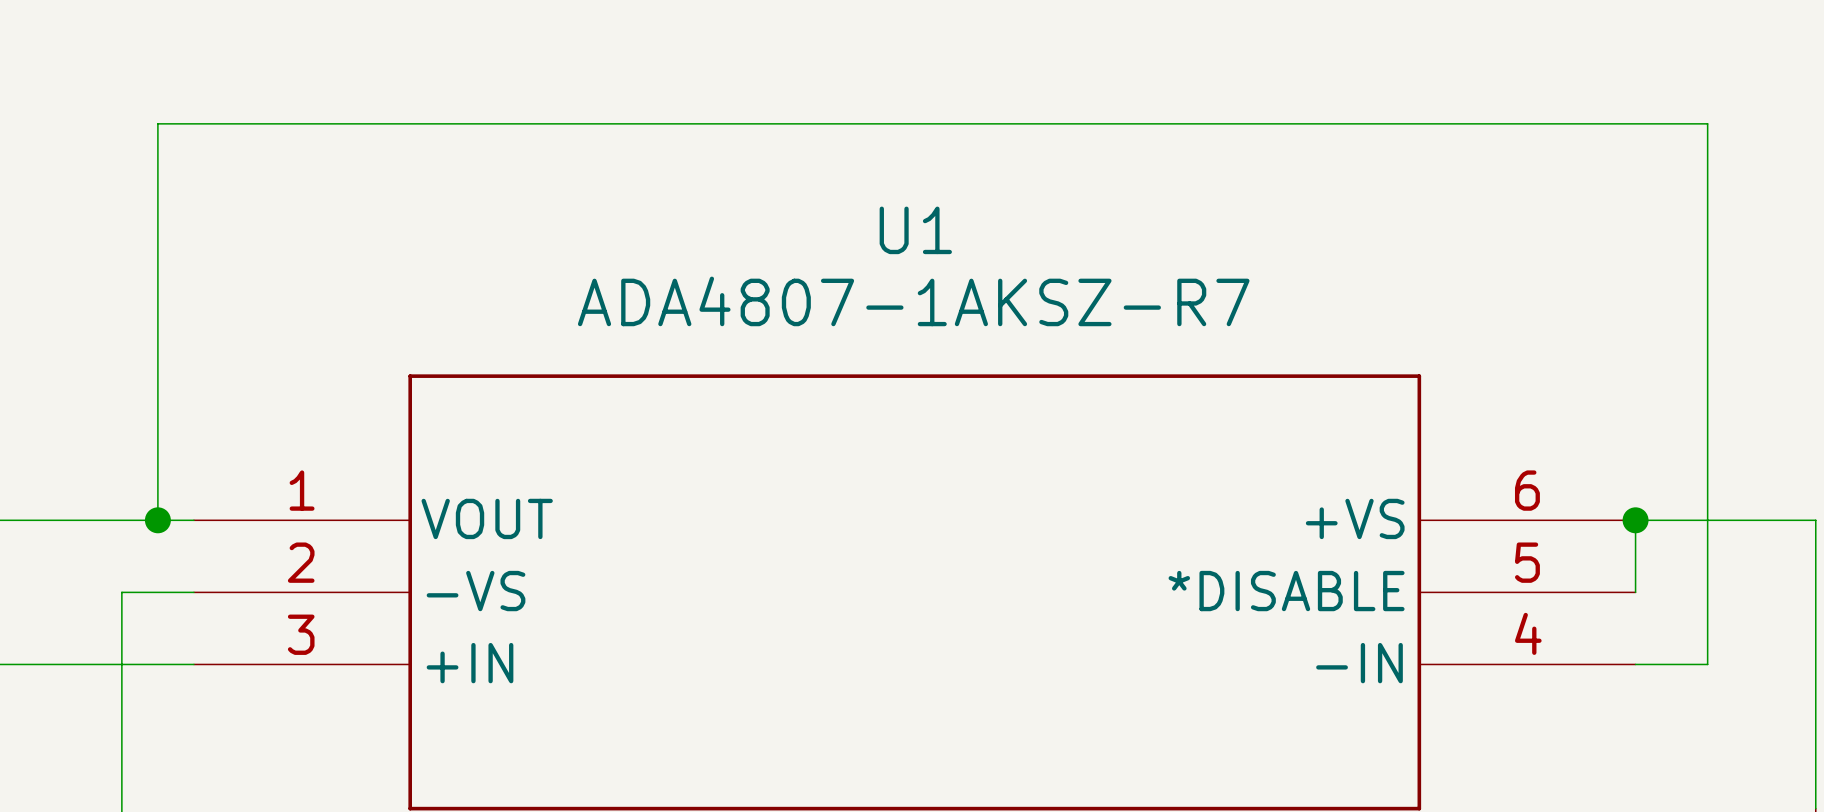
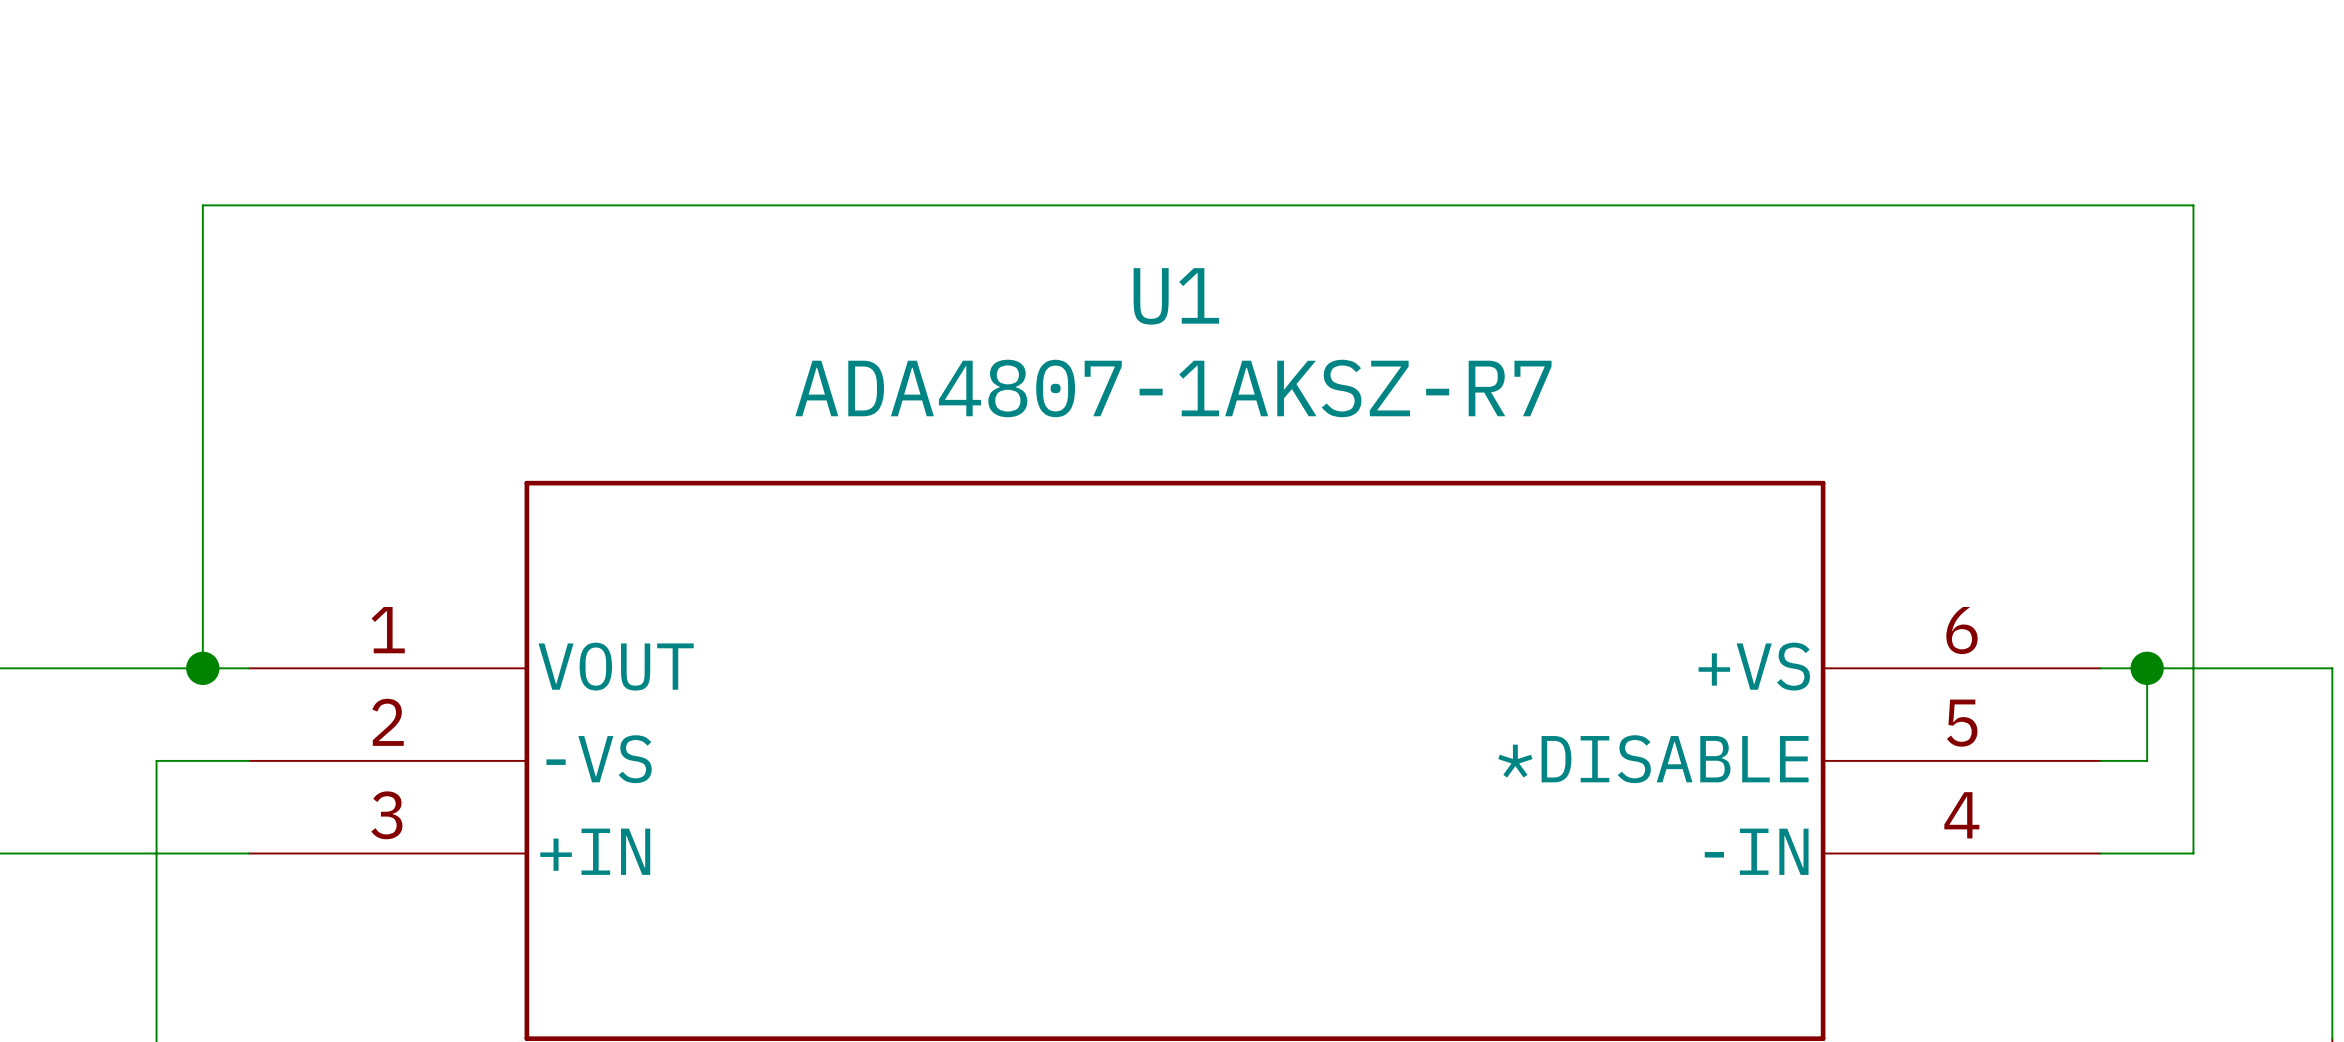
wire: (157, 159) (157, 123) (1707, 123) (1707, 159) -> (202, 205) (2193, 205)
wire: (1635, 520) (1635, 592) -> (2147, 668) (2147, 760) (2100, 760)
junction position: (1635, 520) -> (2147, 668)

